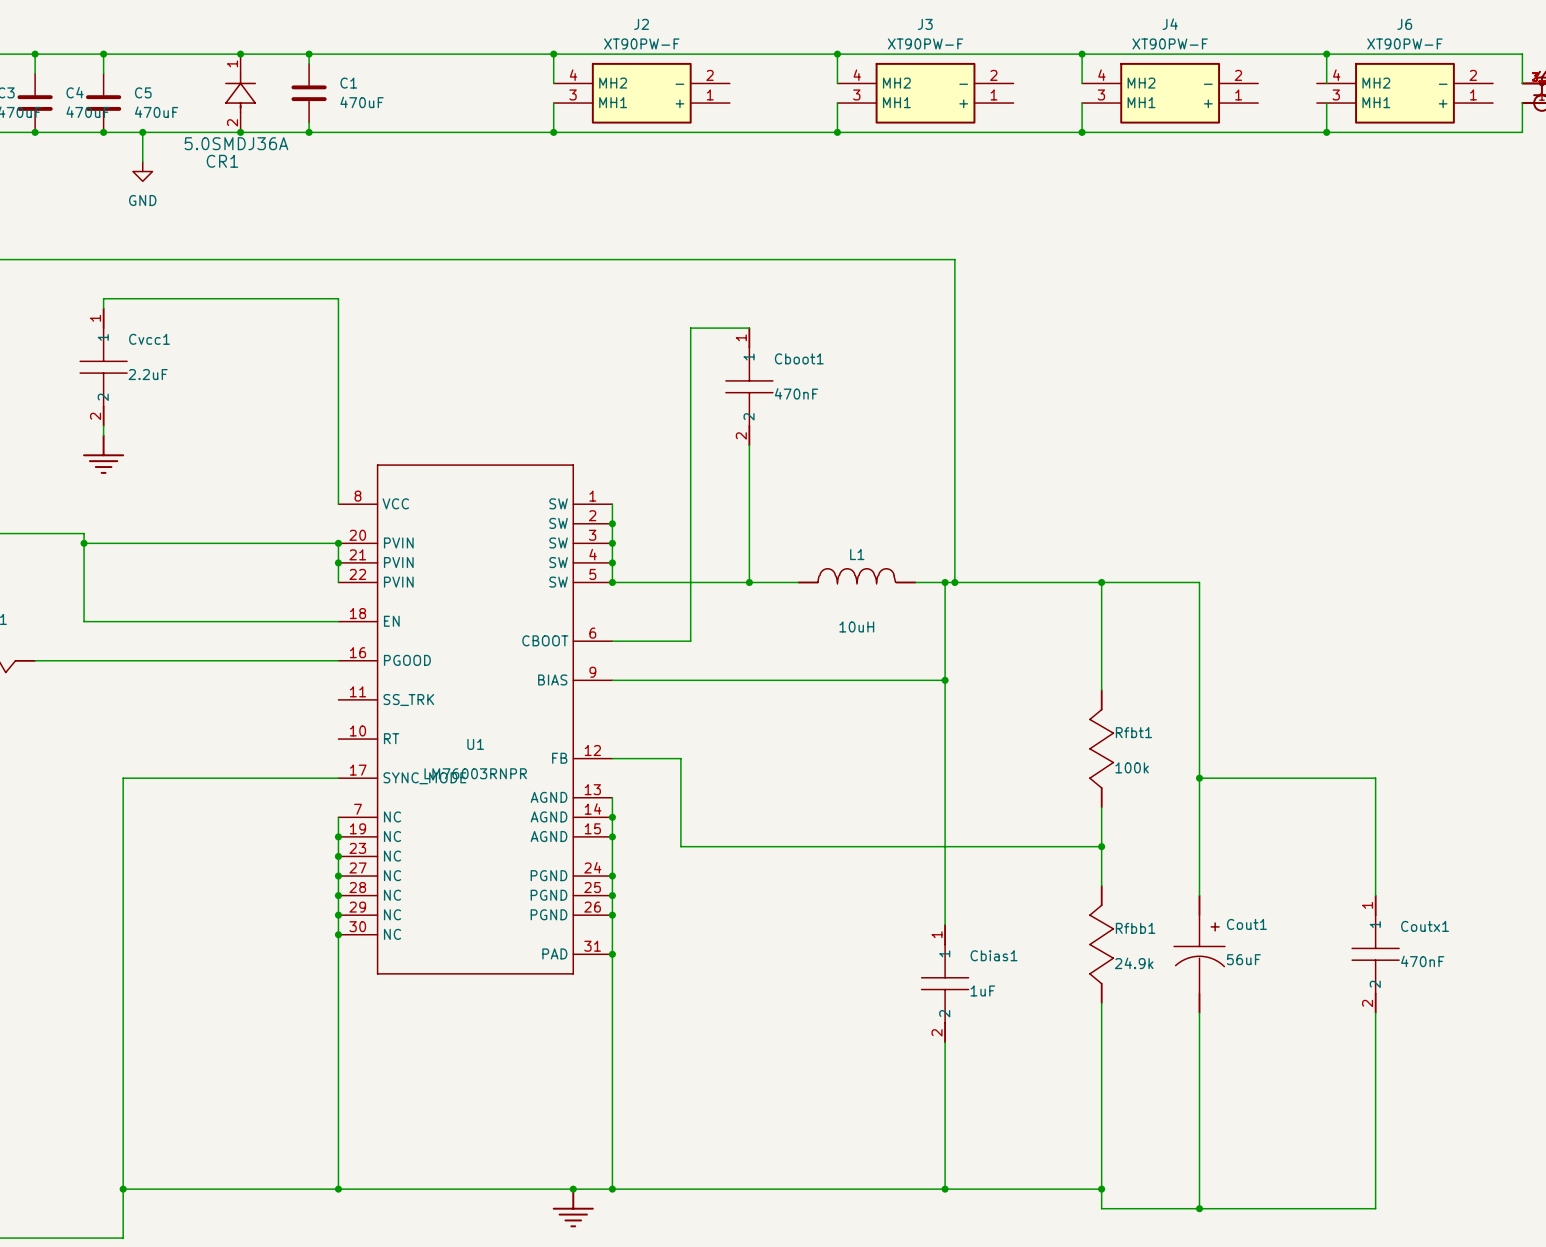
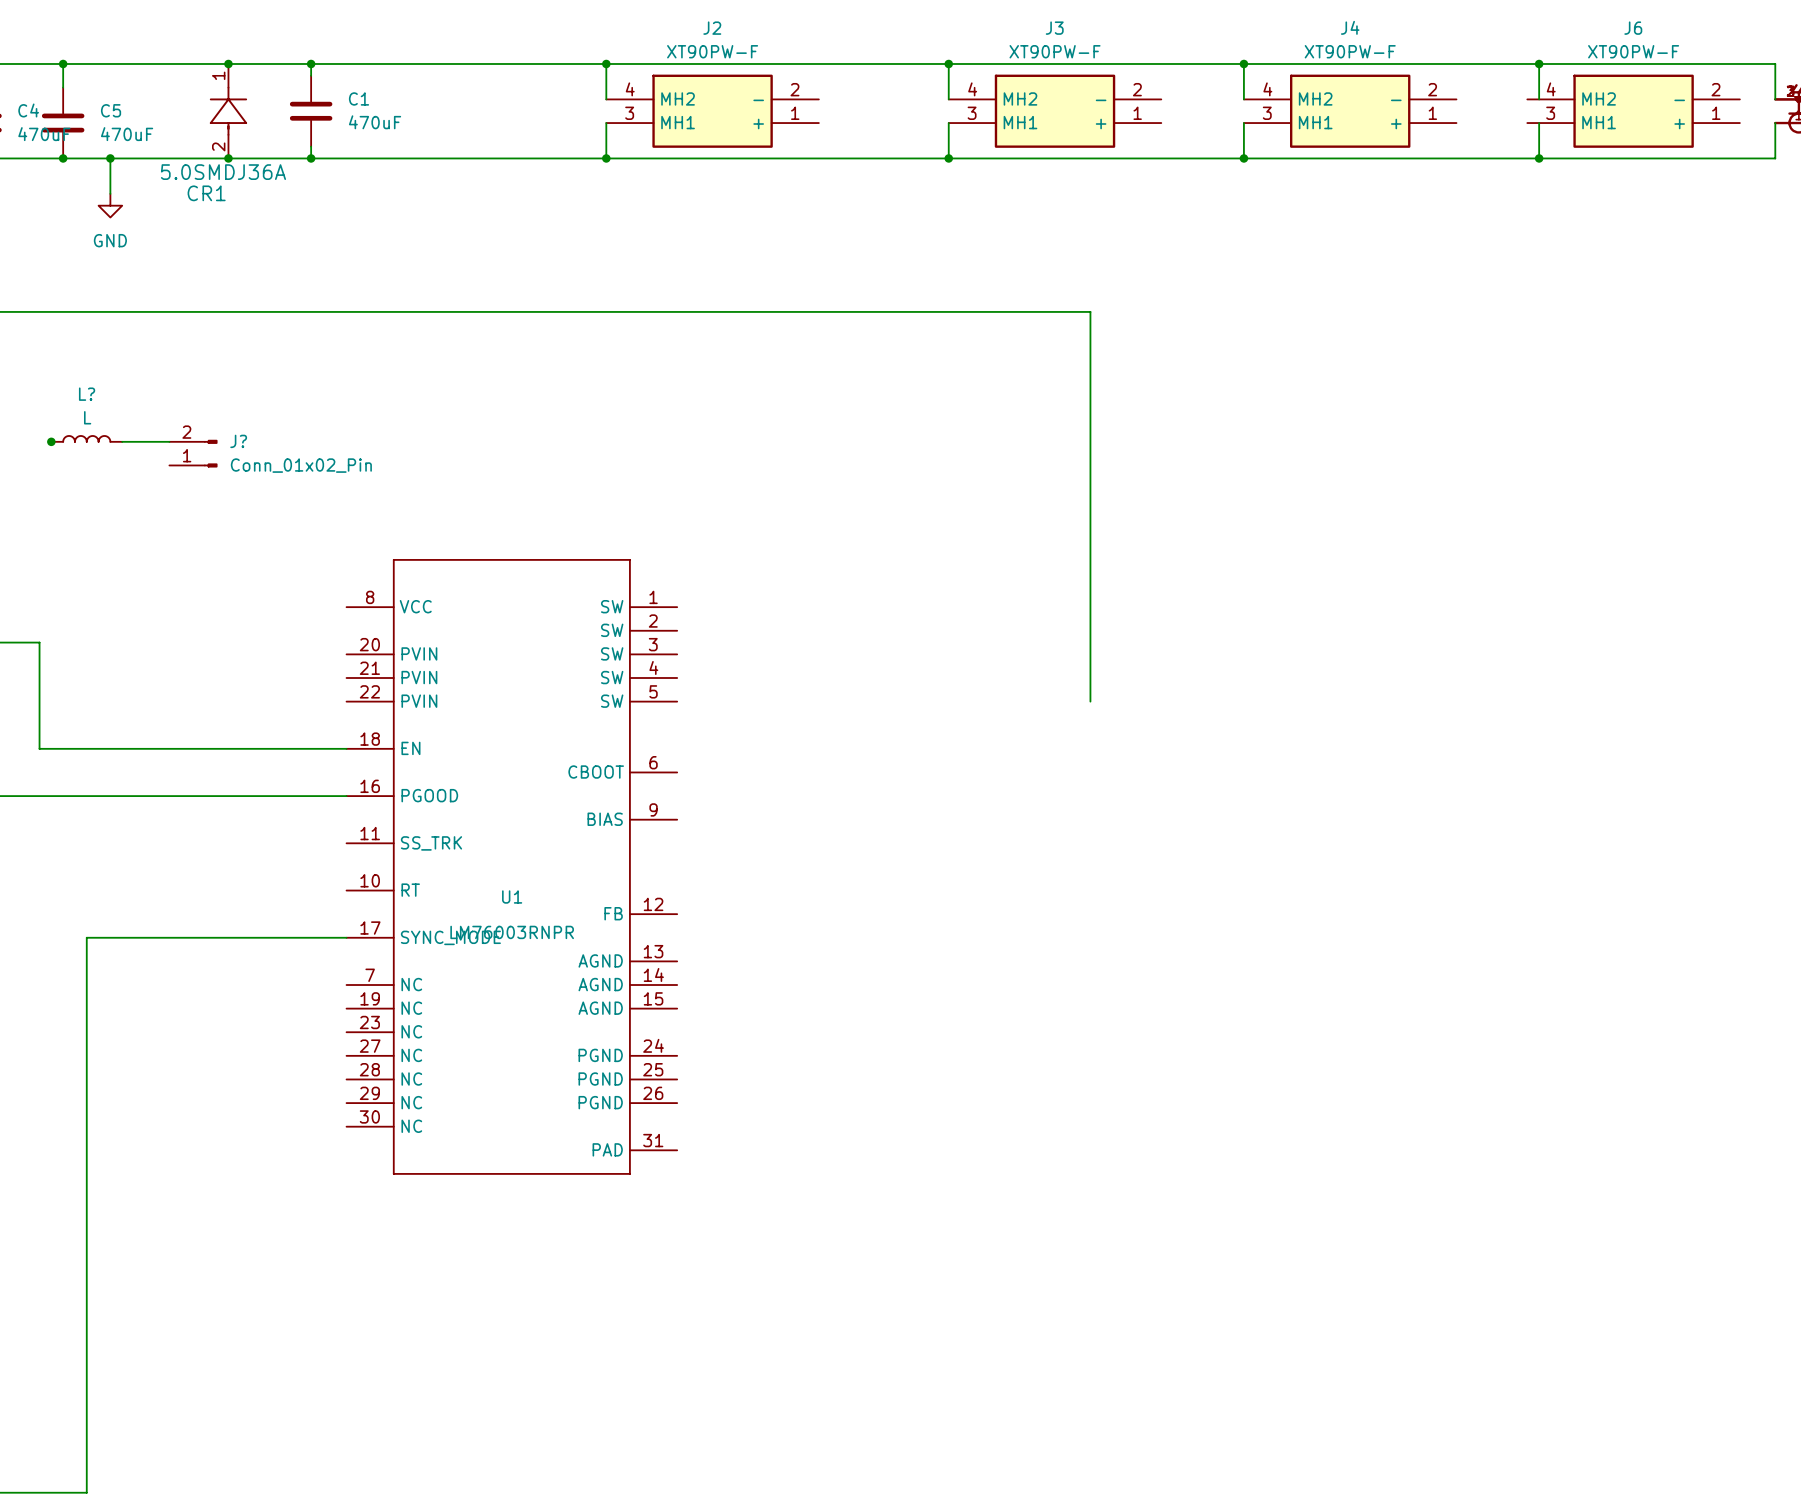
wire: (103, 308) (103, 298) (338, 298) (338, 504) -> none
wire: (749, 328) (690, 328) (690, 641) (612, 641) -> none
L?: none -> L (86, 438)
junction: none -> (51, 441)
Cvcc1: (103, 367) -> none
wire: none -> (122, 441) (169, 441)
J?: none -> Conn_01x02_Pin (193, 453)
Cboot1: (749, 386) -> none
wire: (103, 425) (103, 435) -> none
wire: (749, 445) (749, 582) -> none
power symbol: (103, 454) -> none
wire: (612, 504) (612, 582) (798, 582) -> none
junction: (612, 523) -> none
wire: (84, 543) (338, 543) (338, 582) -> none
junction: (84, 543) -> none
junction: (338, 543) -> none
junction: (612, 543) -> none
junction: (338, 562) -> none
junction: (612, 562) -> none
L1: (857, 576) -> none
junction: (612, 582) -> none
junction: (749, 582) -> none
wire: (915, 582) (1199, 582) (1199, 895) -> none
wire: (945, 582) (945, 924) -> none
junction: (945, 582) -> none
junction: (954, 582) -> none
wire: (1101, 582) (1101, 690) -> none
junction: (1101, 582) -> none
wire: (612, 680) (945, 680) -> none
junction: (945, 680) -> none
Rfbt1: (1101, 748) -> none
wire: (612, 758) (680, 758) (680, 846) (1101, 846) -> none
wire: (1199, 778) (1375, 778) (1375, 895) -> none
junction: (1199, 778) -> none
wire: (612, 797) (612, 1189) -> none
wire: (1101, 807) (1101, 885) -> none
wire: (338, 817) (338, 1189) -> none
junction: (612, 817) -> none
junction: (338, 836) -> none
junction: (612, 836) -> none
junction: (1101, 846) -> none
junction: (338, 856) -> none
junction: (338, 876) -> none
junction: (612, 876) -> none
junction: (338, 895) -> none
junction: (612, 895) -> none
junction: (338, 915) -> none
junction: (612, 915) -> none
junction: (338, 934) -> none
Rfbb1: (1101, 944) -> none
junction: (612, 954) -> none
Cout1: (1199, 954) -> none
Coutx1: (1375, 954) -> none
Cbias1: (945, 983) -> none
wire: (1101, 1003) (1101, 1208) (1375, 1208) (1375, 1013) -> none
wire: (1199, 1013) (1199, 1208) -> none
wire: (945, 1042) (945, 1189) -> none
wire: (123, 1189) (1101, 1189) -> none
junction: (123, 1189) -> none
junction: (338, 1189) -> none
junction: (573, 1189) -> none
junction: (612, 1189) -> none
junction: (945, 1189) -> none
junction: (1101, 1189) -> none
power symbol: (573, 1207) -> none
junction: (1199, 1208) -> none

